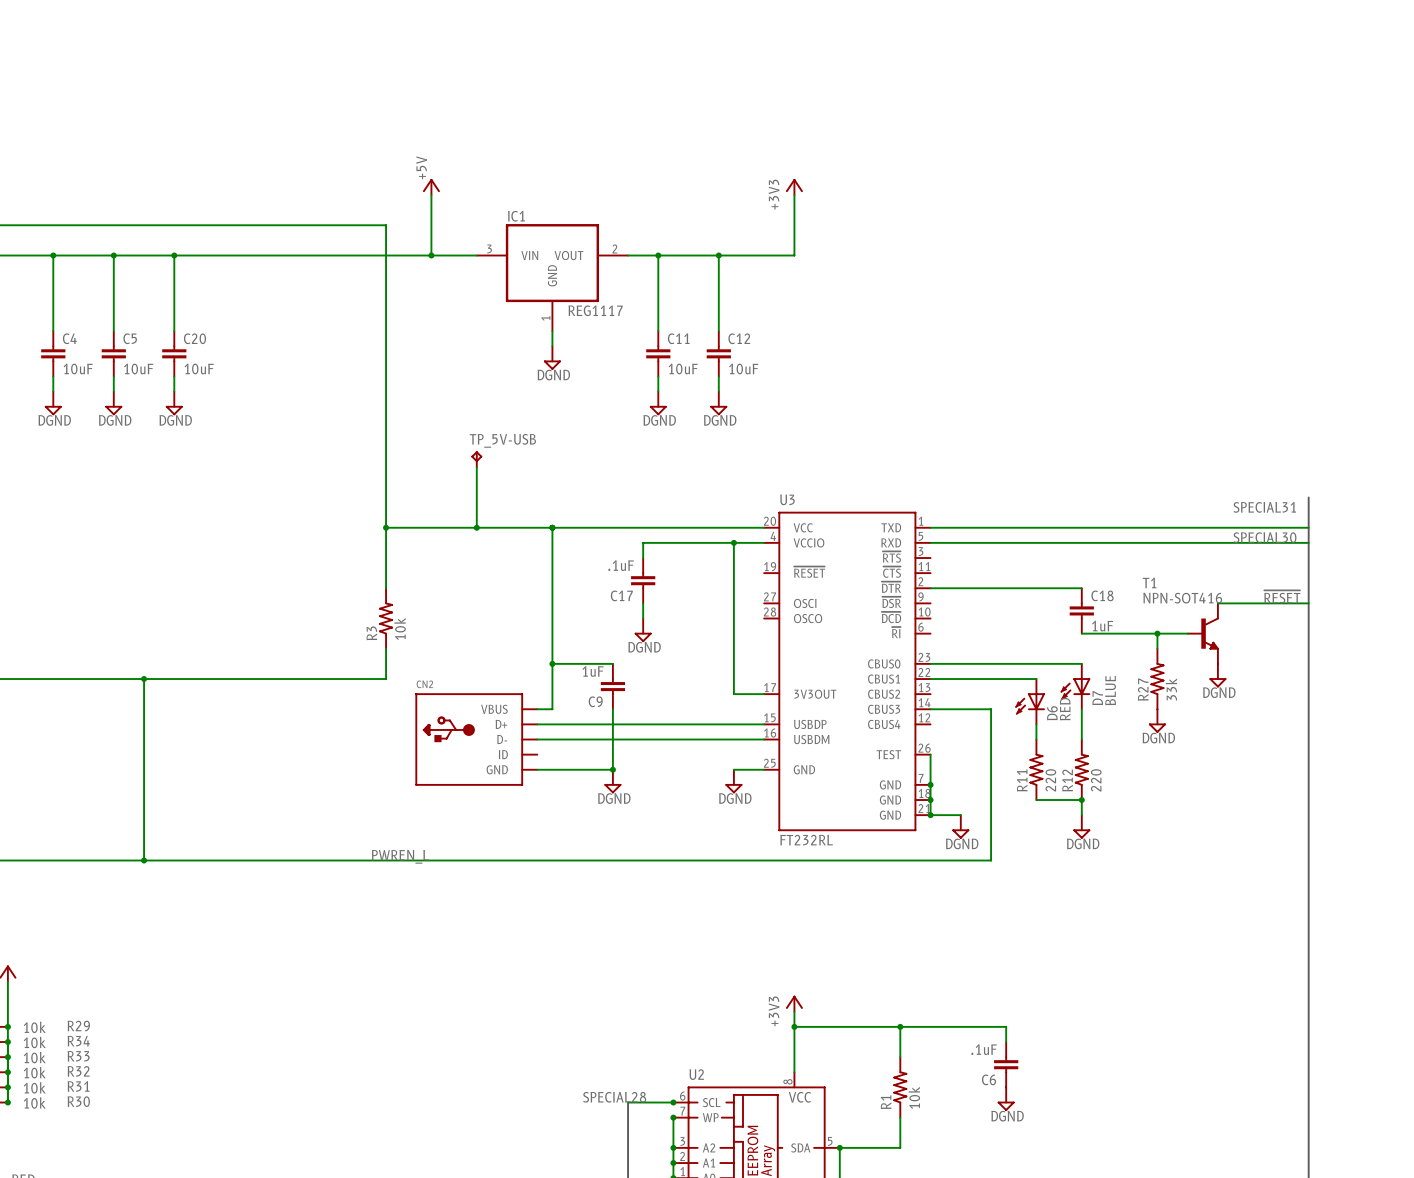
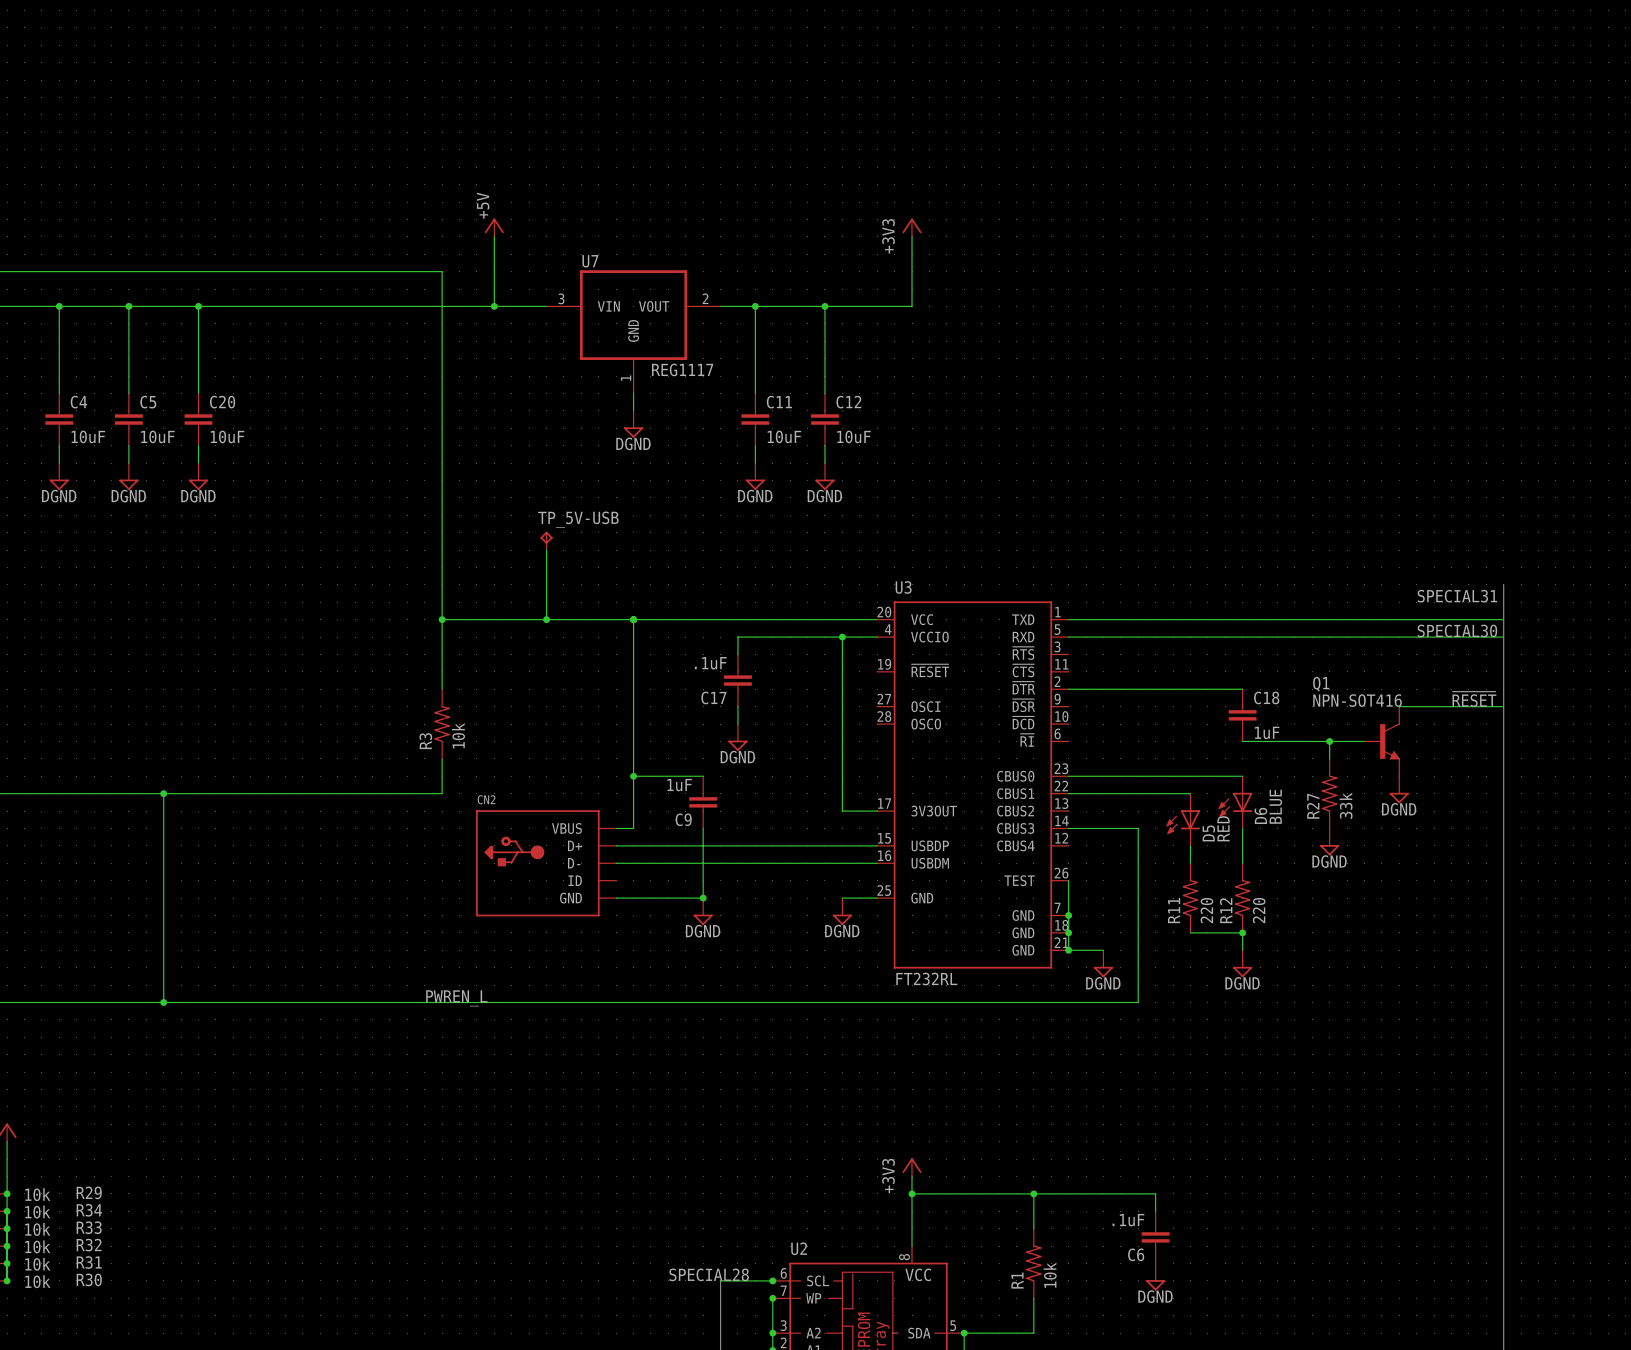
IC1 name: IC1 (516, 216) -> U7 (590, 261)
T1 name: T1 (1149, 582) -> Q1 (1321, 684)
D7 name: D7 (1097, 698) -> D6 (1260, 815)
D6 name: D6 (1052, 713) -> D5 (1208, 833)

